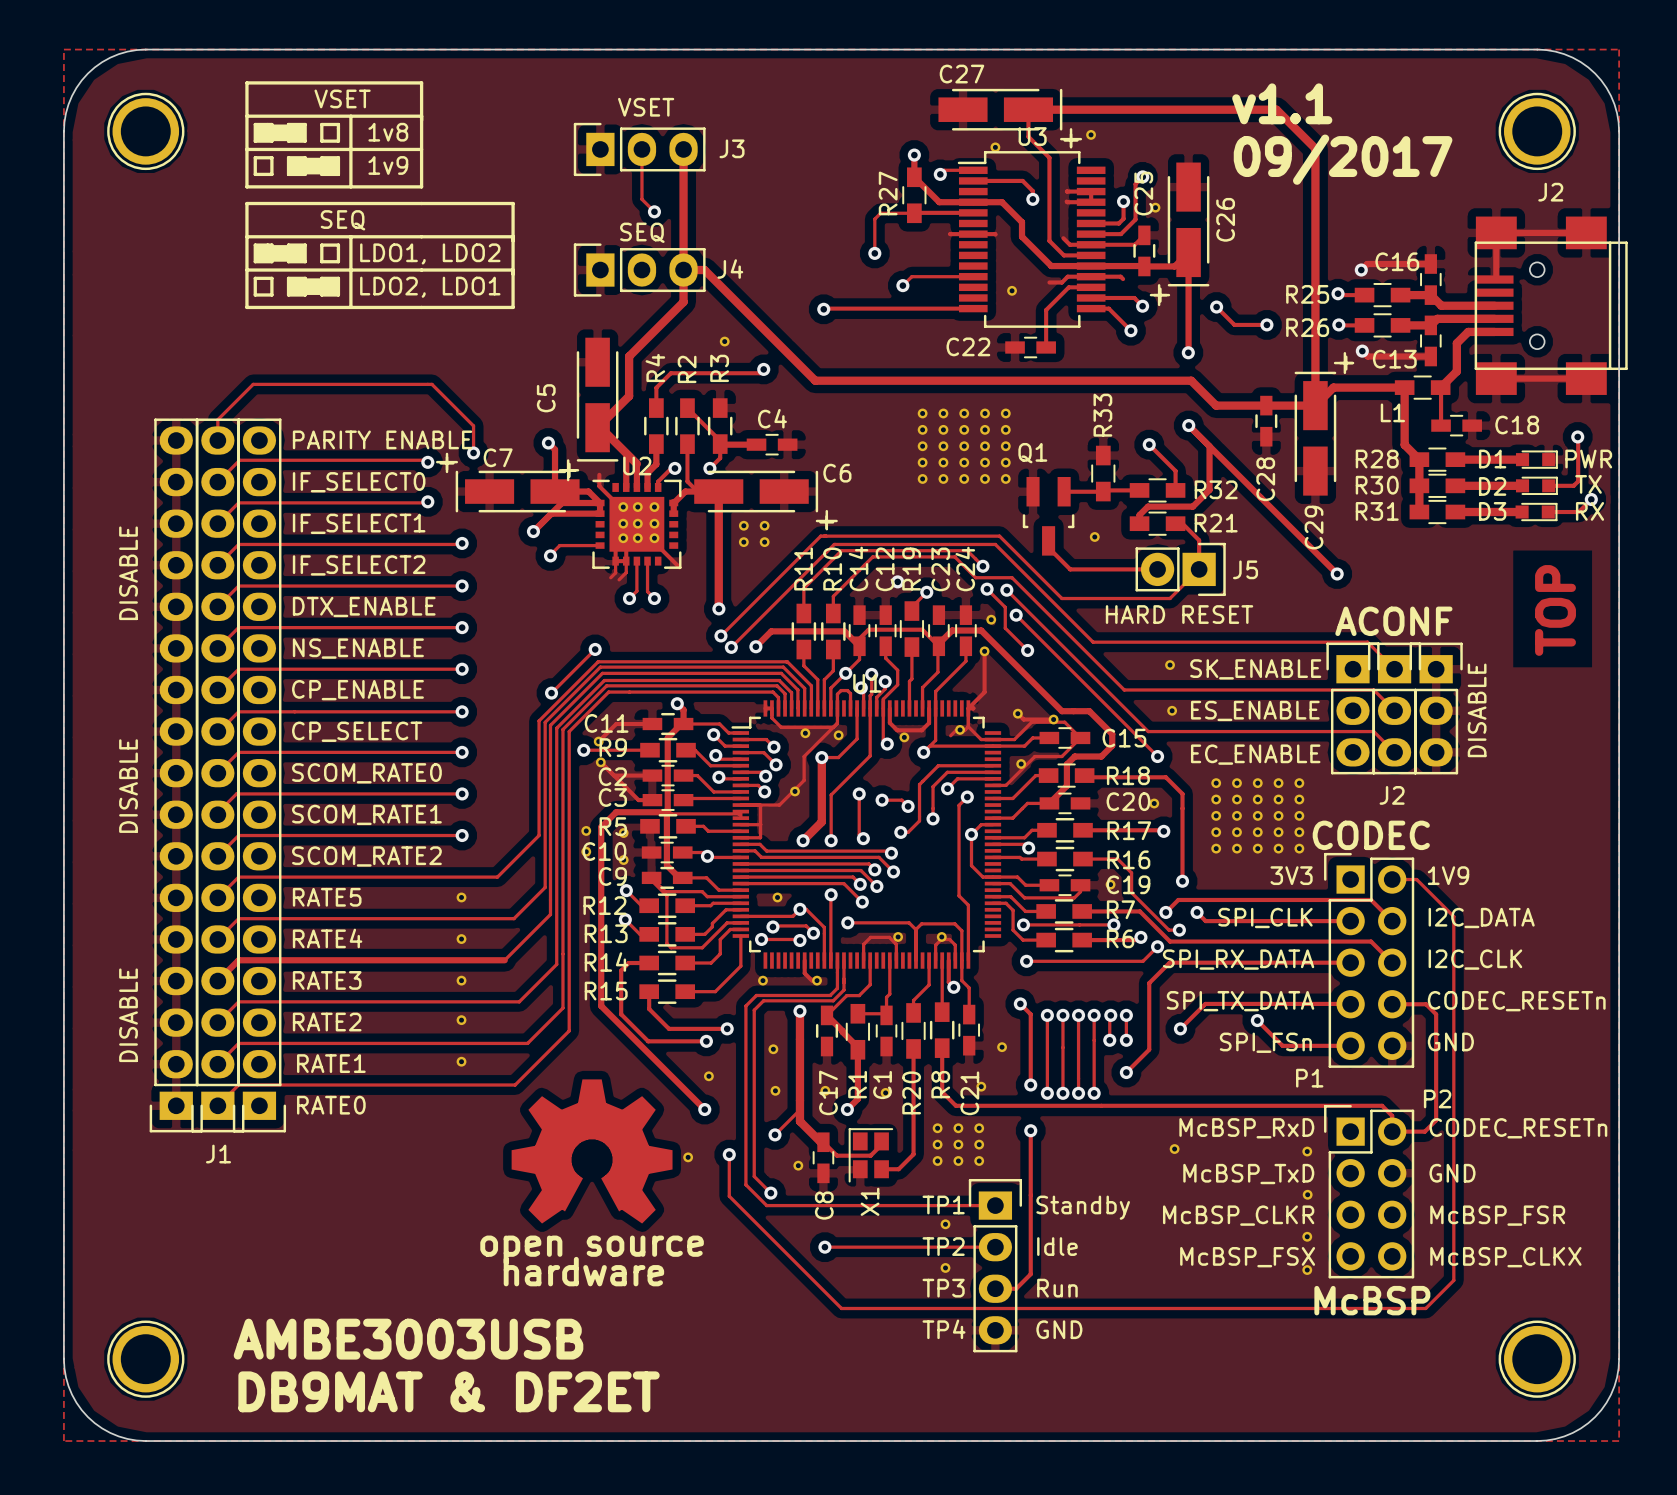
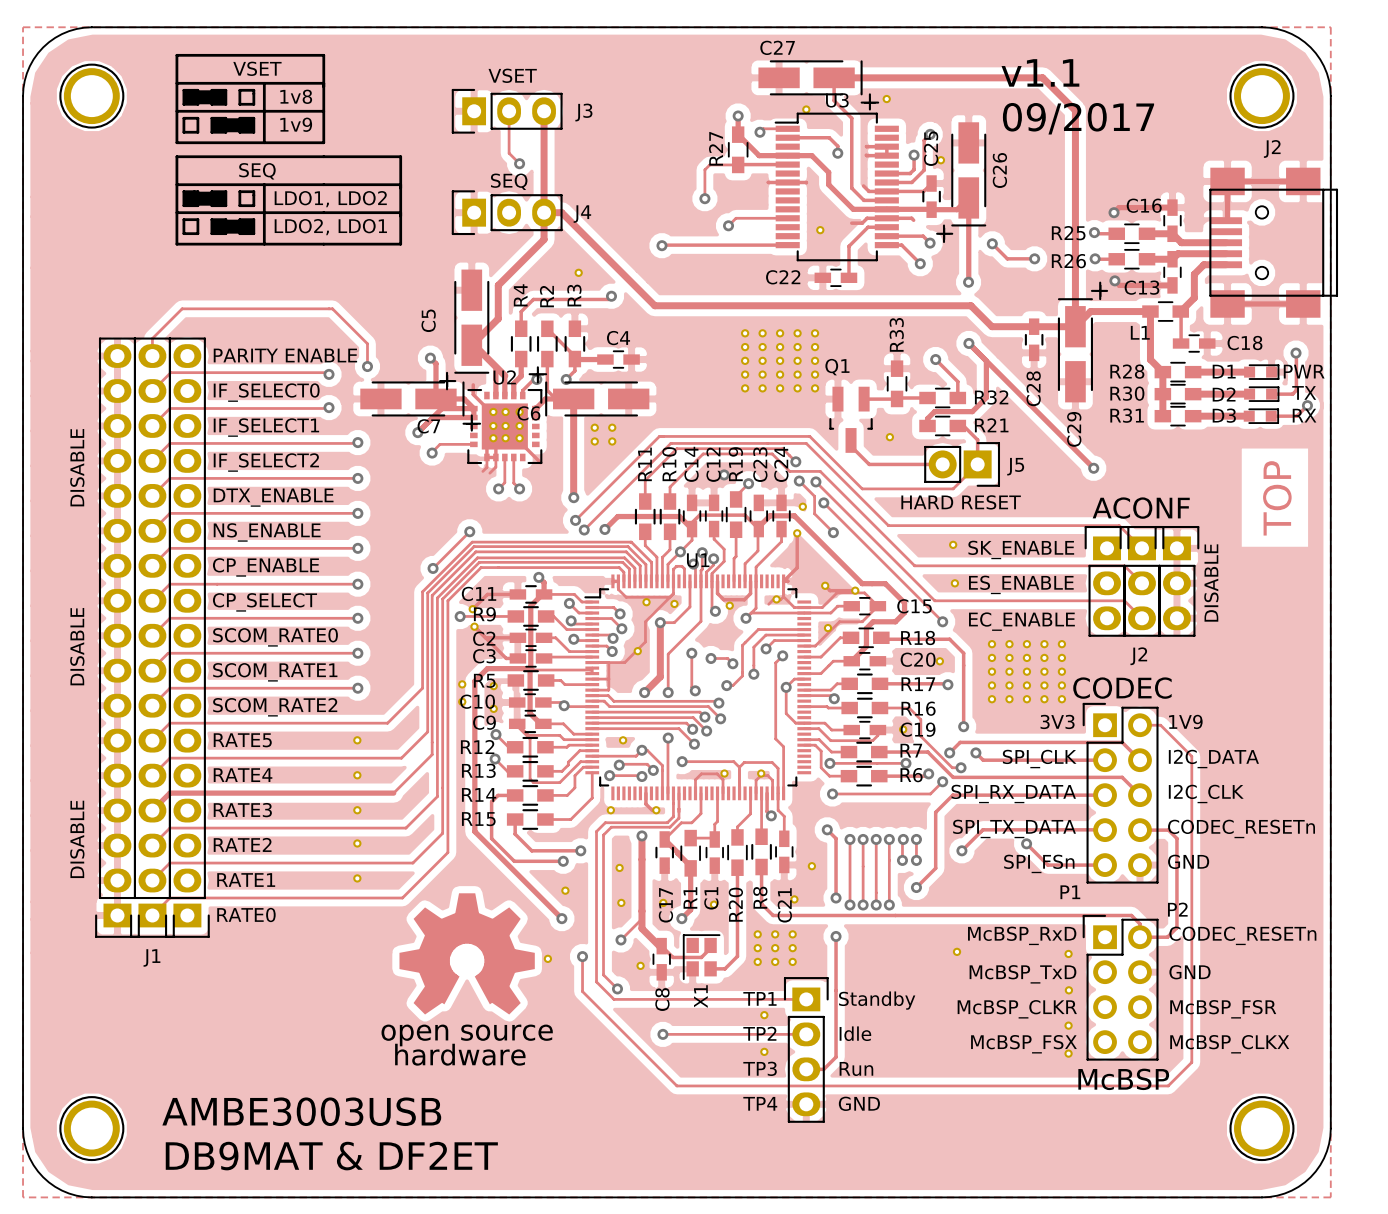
C7 rotation: 0° (507, 482) -> 180° (420, 406)
C6 rotation: 0° (766, 500) -> 180° (588, 391)

